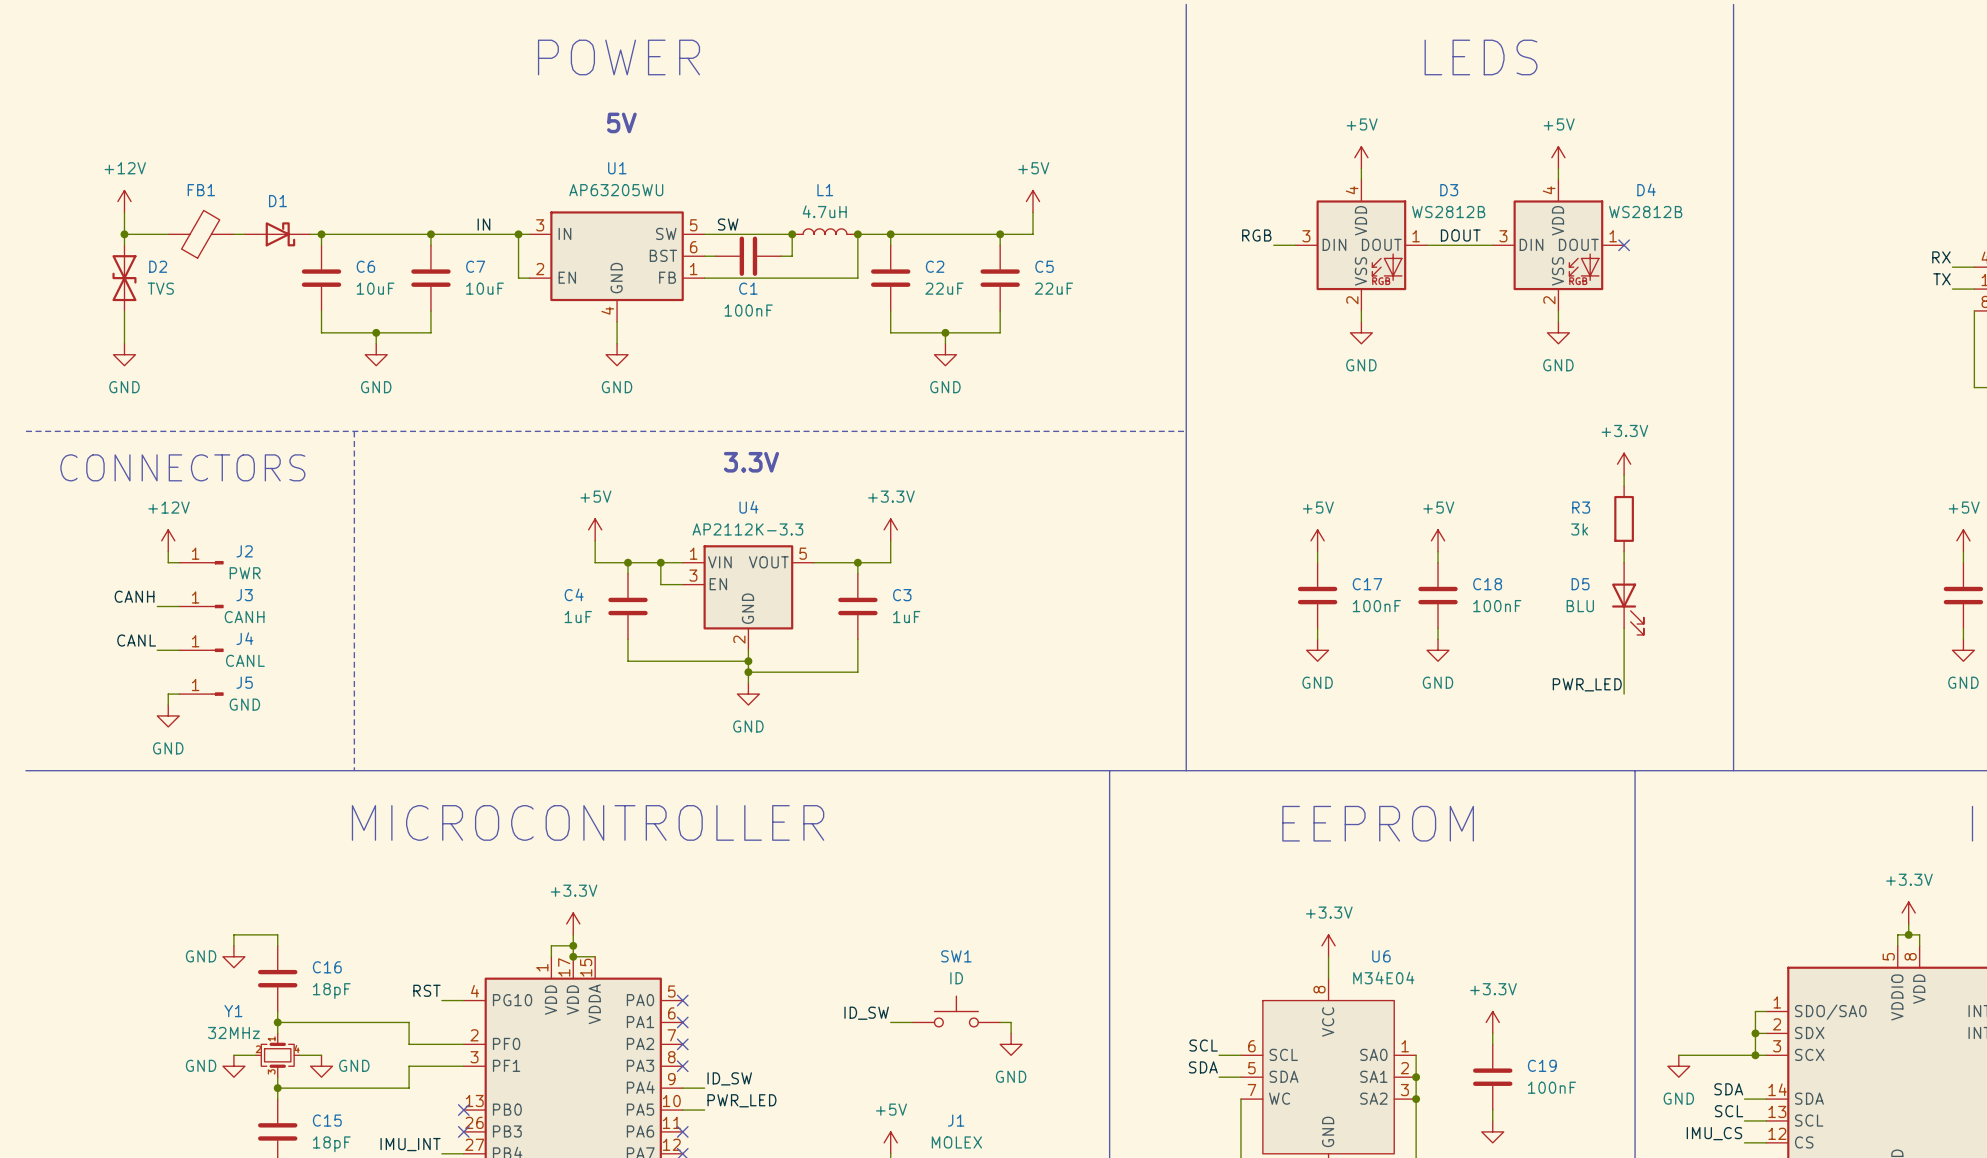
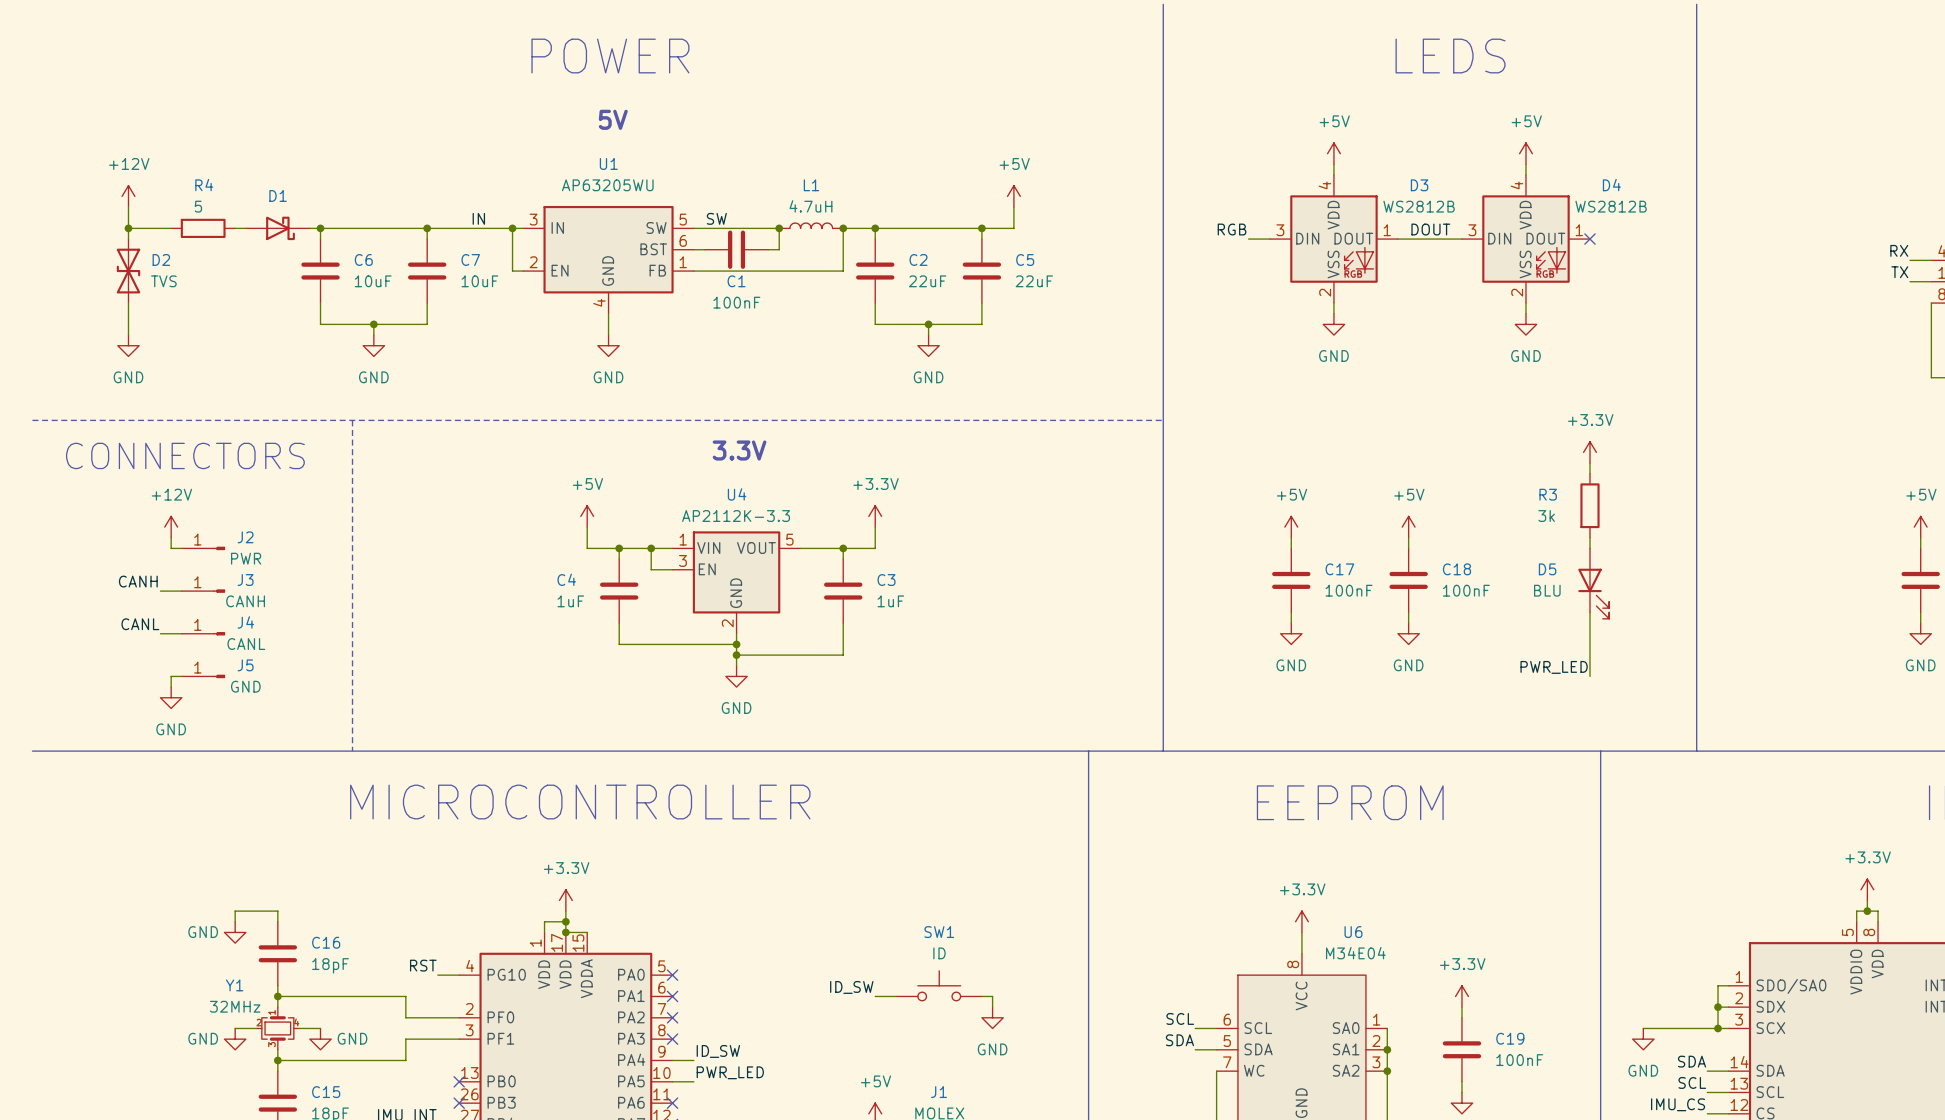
FB1: (201, 234) -> none
R4: none -> 5 (203, 228)

